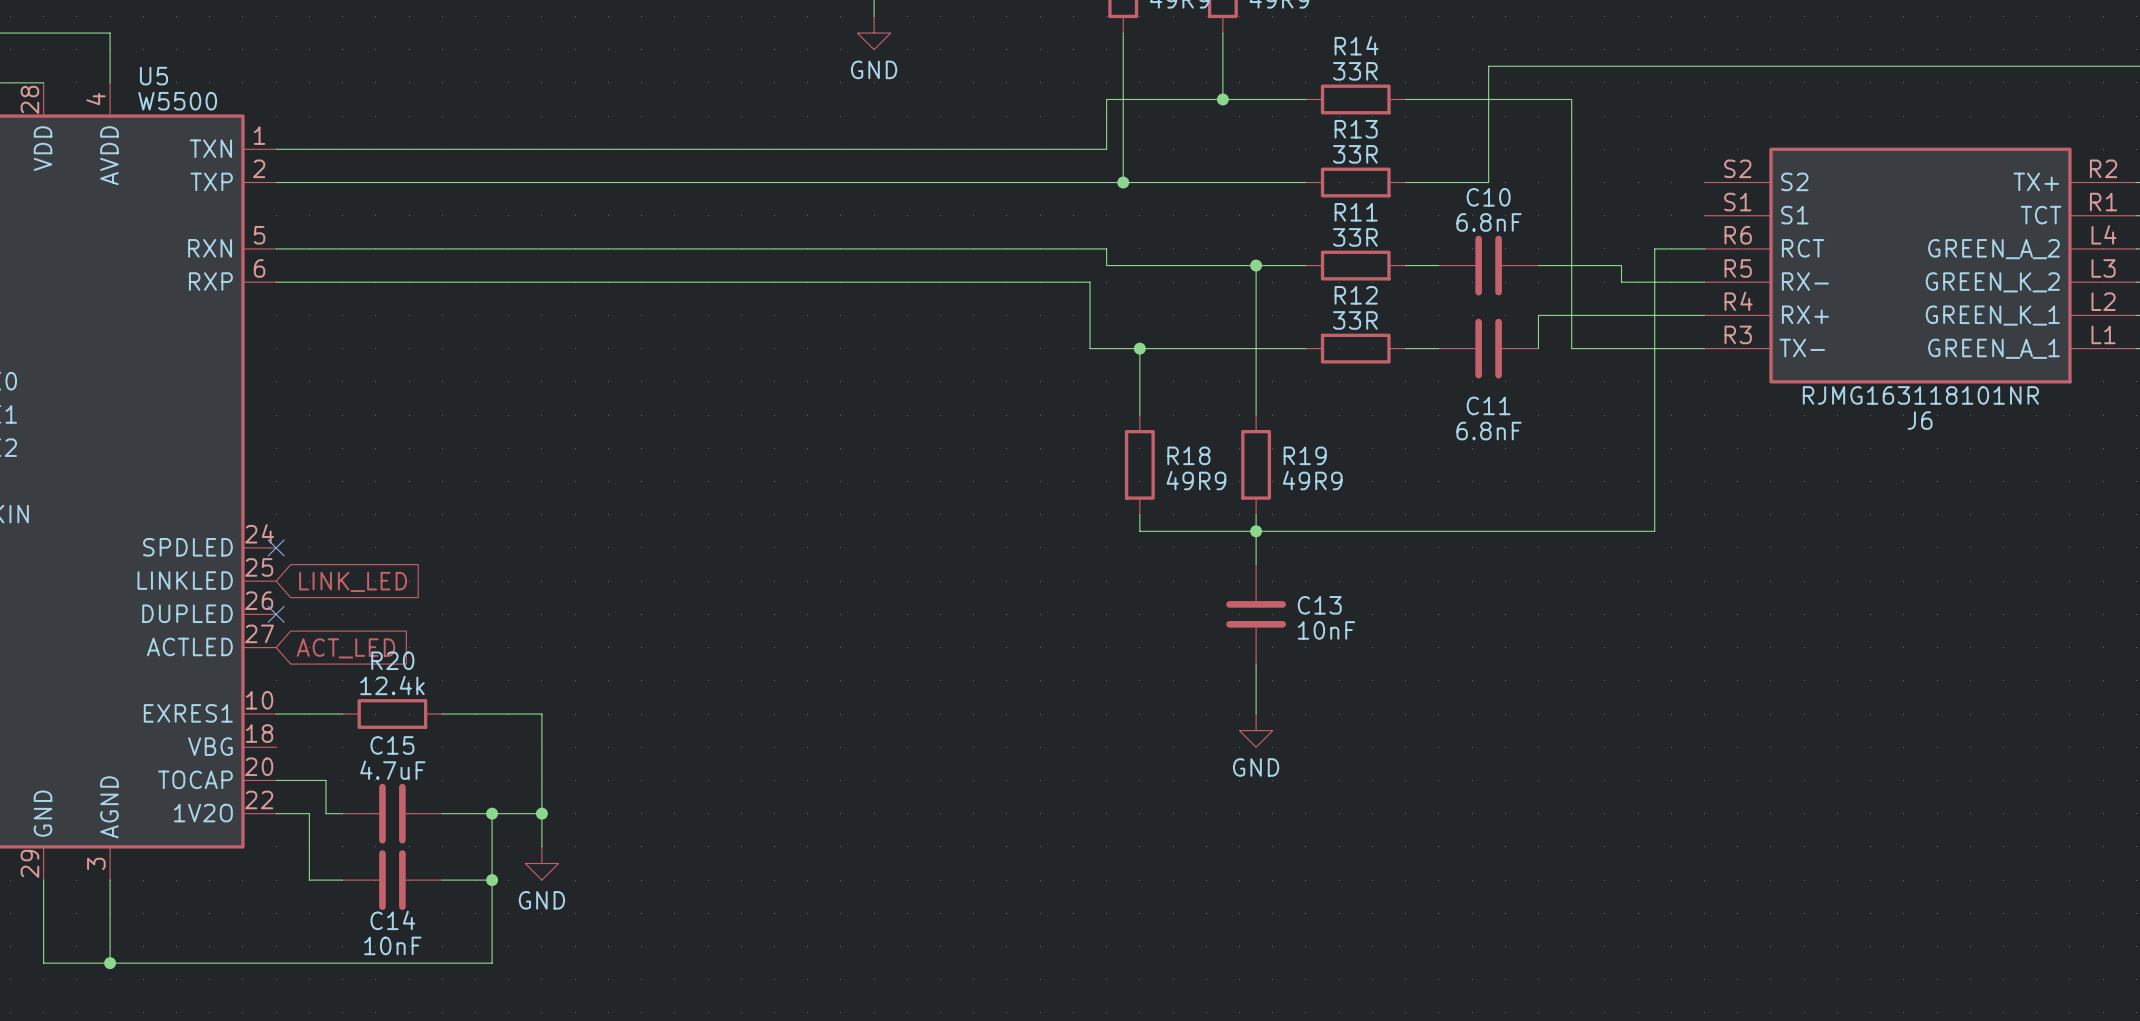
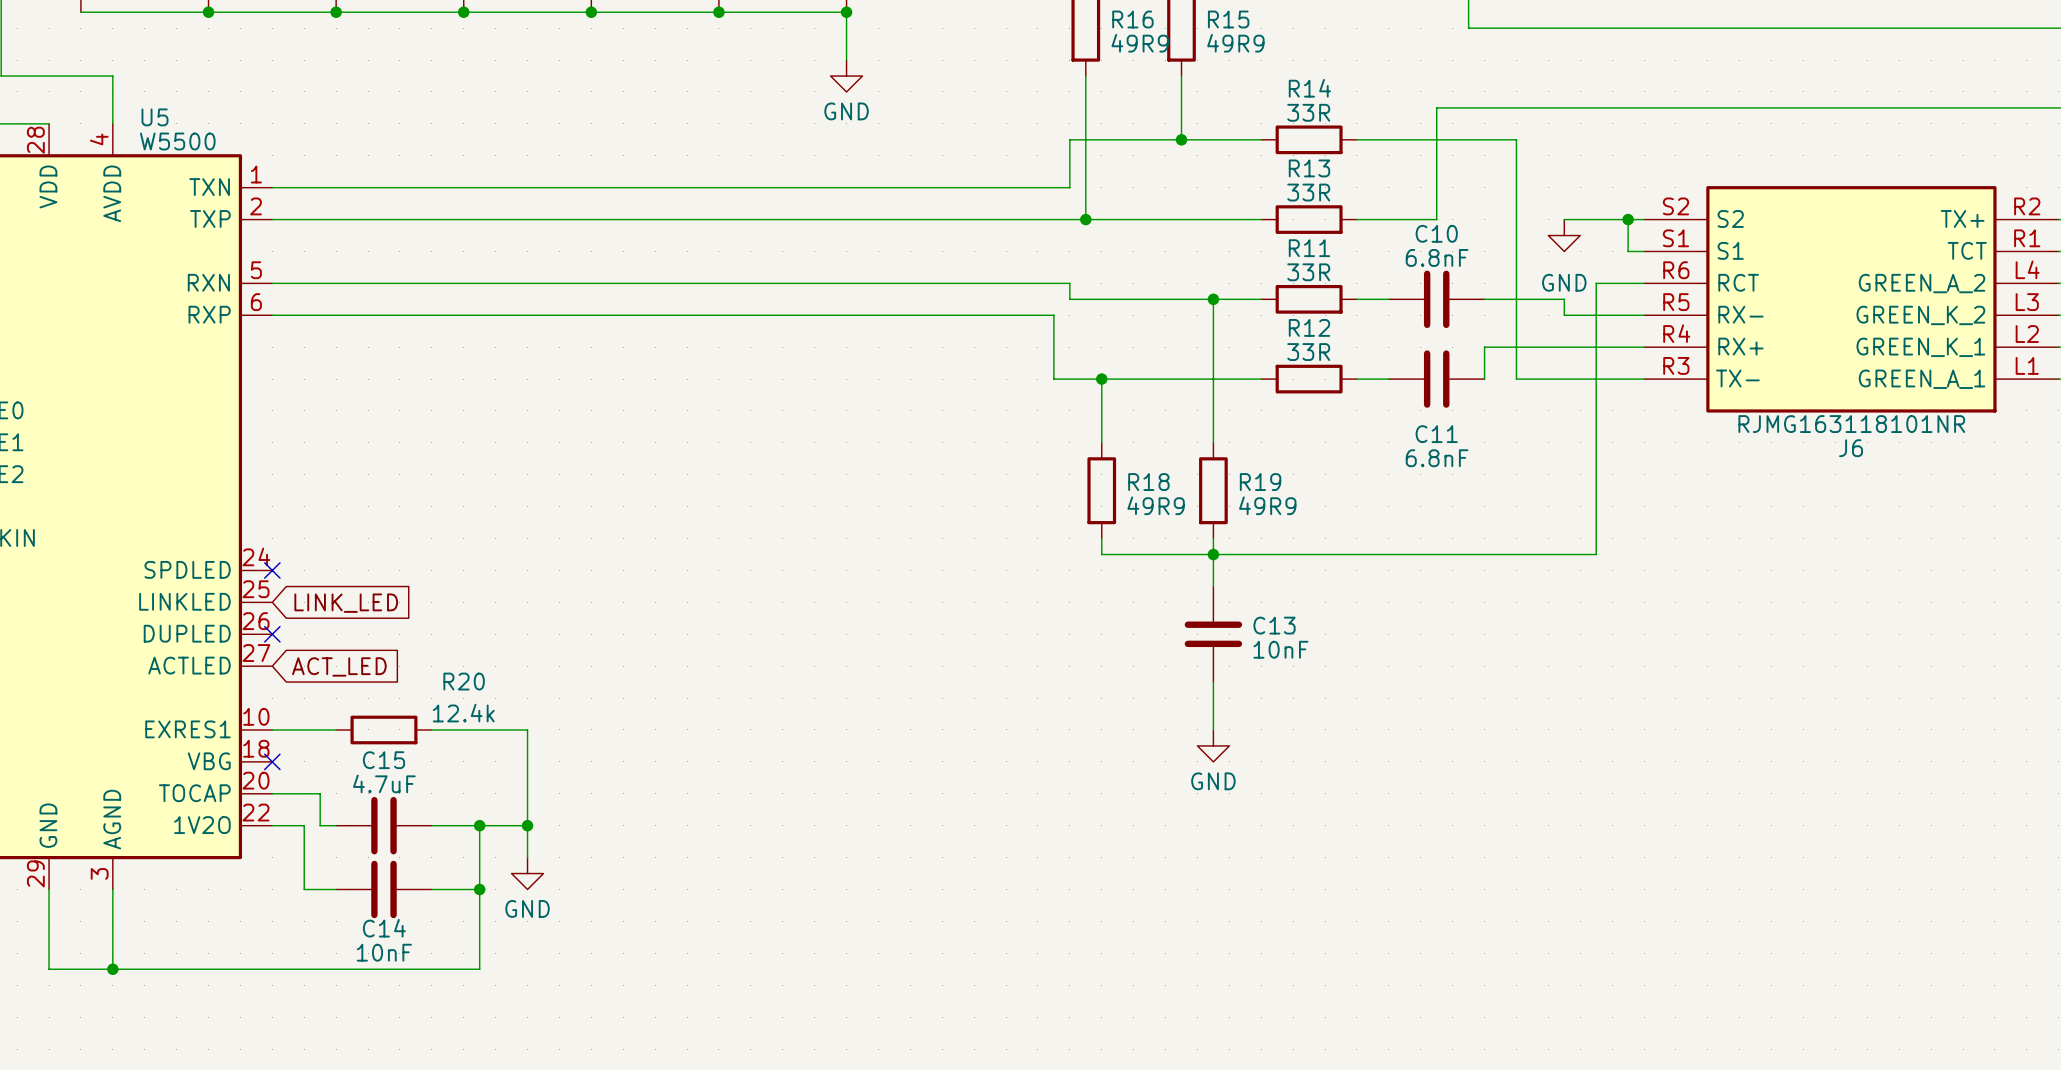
wire: none -> (1564, 219) (1644, 219)
wire: none -> (1628, 219) (1628, 251) (1644, 251)
junction: none -> (1628, 219)
power symbol: none -> GND (1564, 235)
R20 name position: R20 (392, 660) -> R20 (464, 681)
R20 value position: 12.4k (392, 685) -> 12.4k (463, 713)
no-connect mark: none -> (272, 761)

